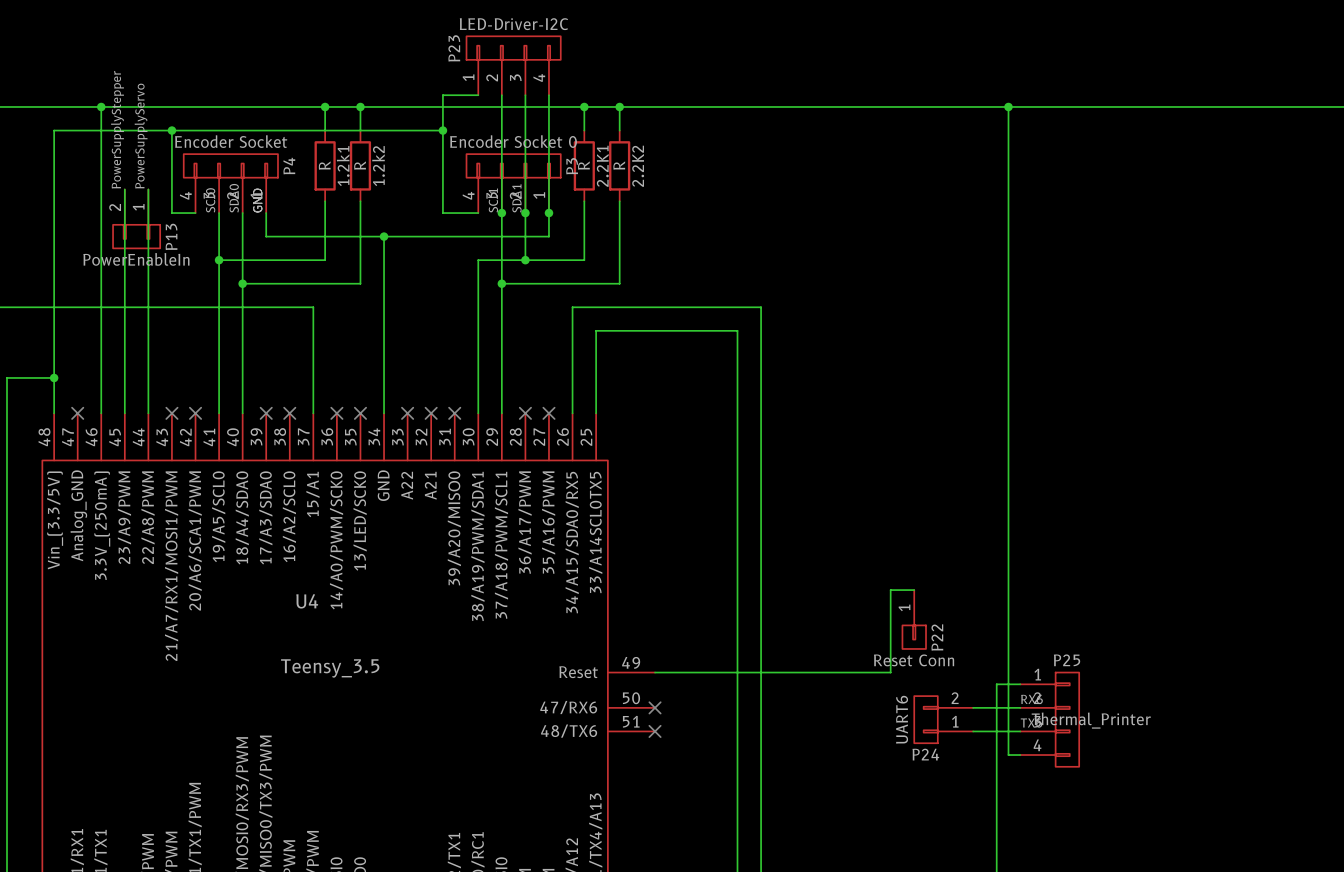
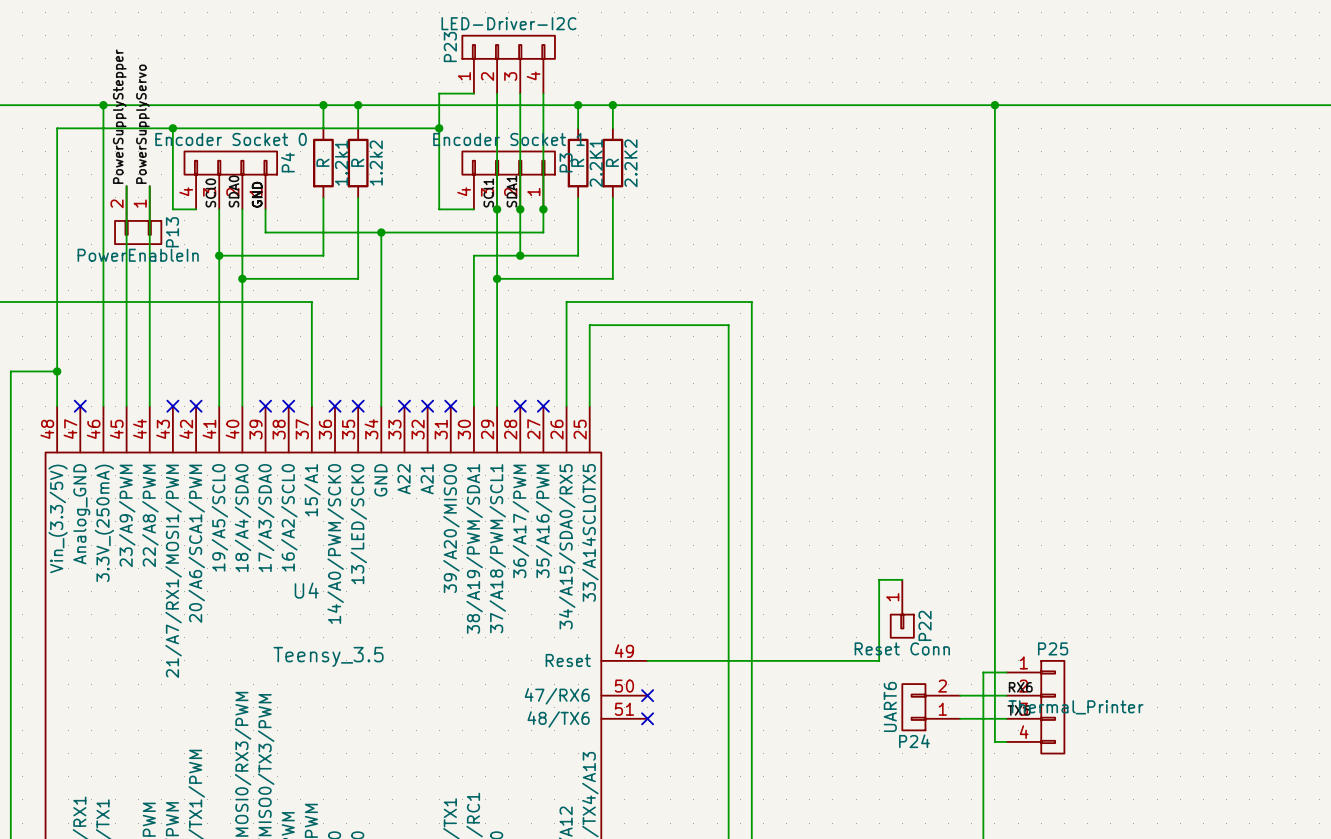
P4 value: Encoder Socket (231, 141) -> Encoder Socket 0 (231, 139)
P3 value: Encoder Socket 0 (513, 141) -> Encoder Socket 1 (508, 139)

